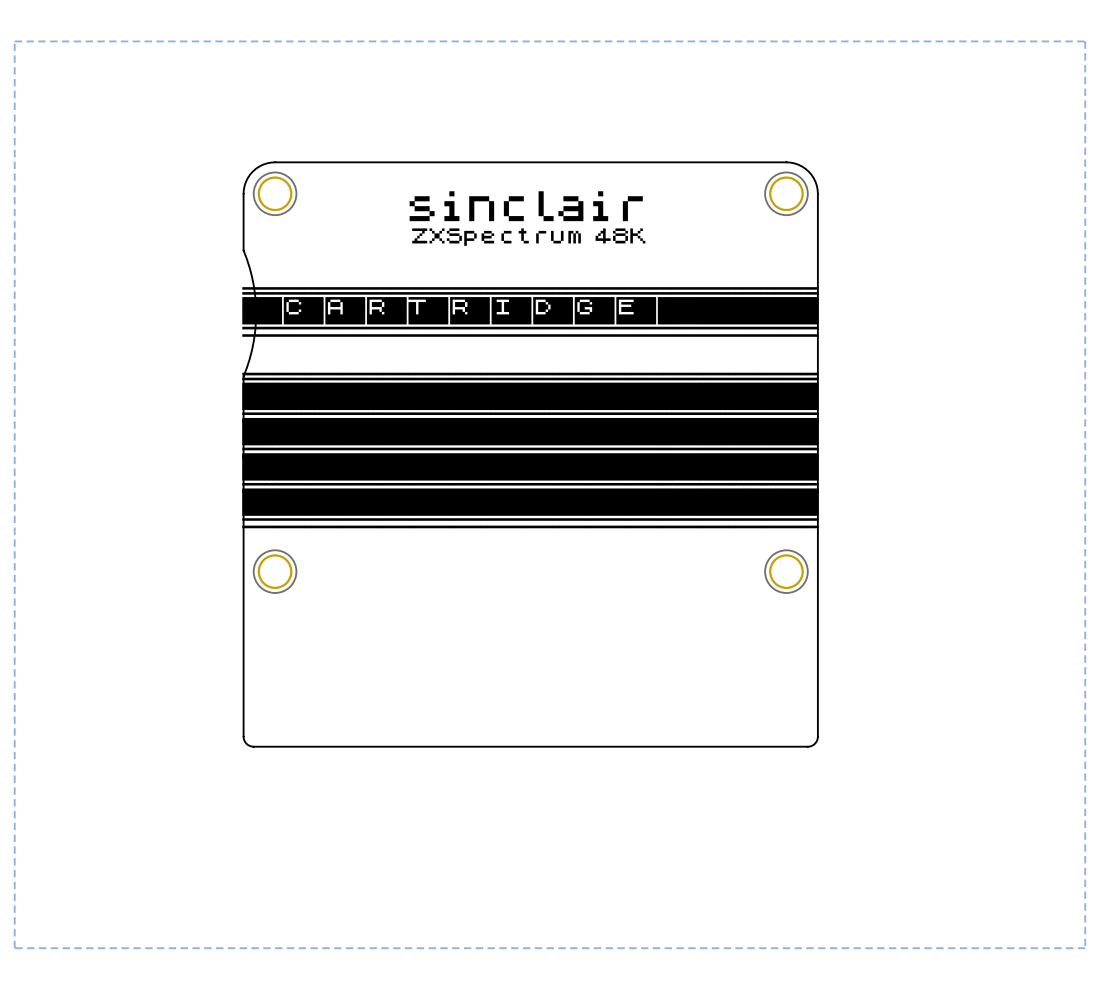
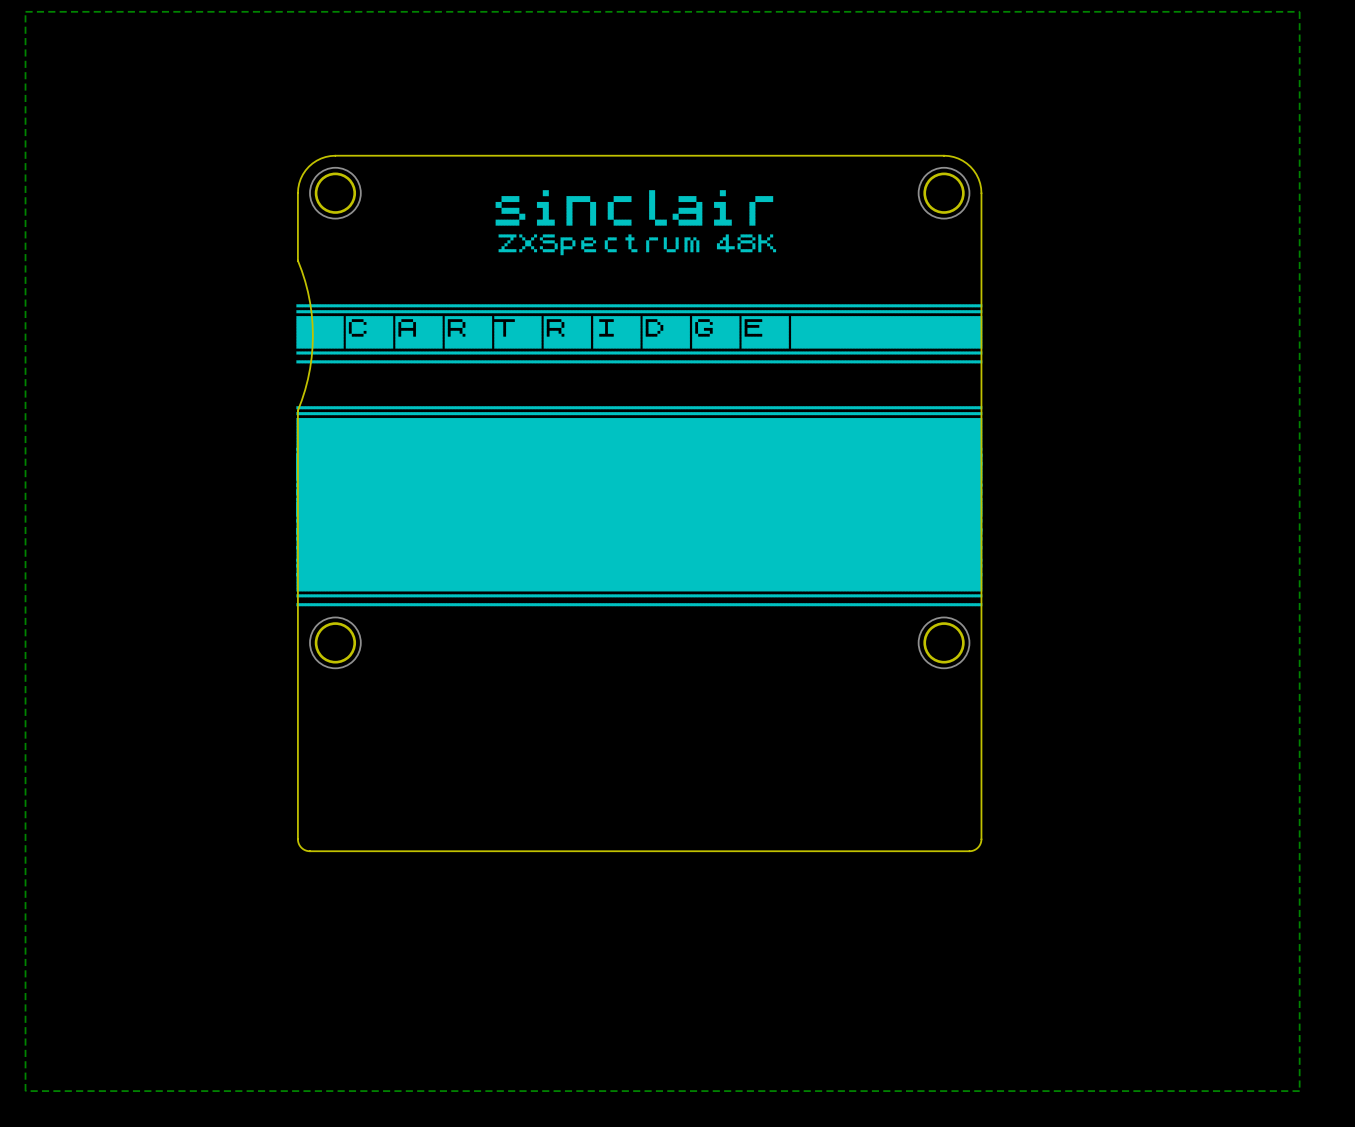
drawing: none -> [296, 447, 983, 607]
drawing: [242, 417, 819, 458] -> none
drawing: [242, 488, 819, 529] -> none

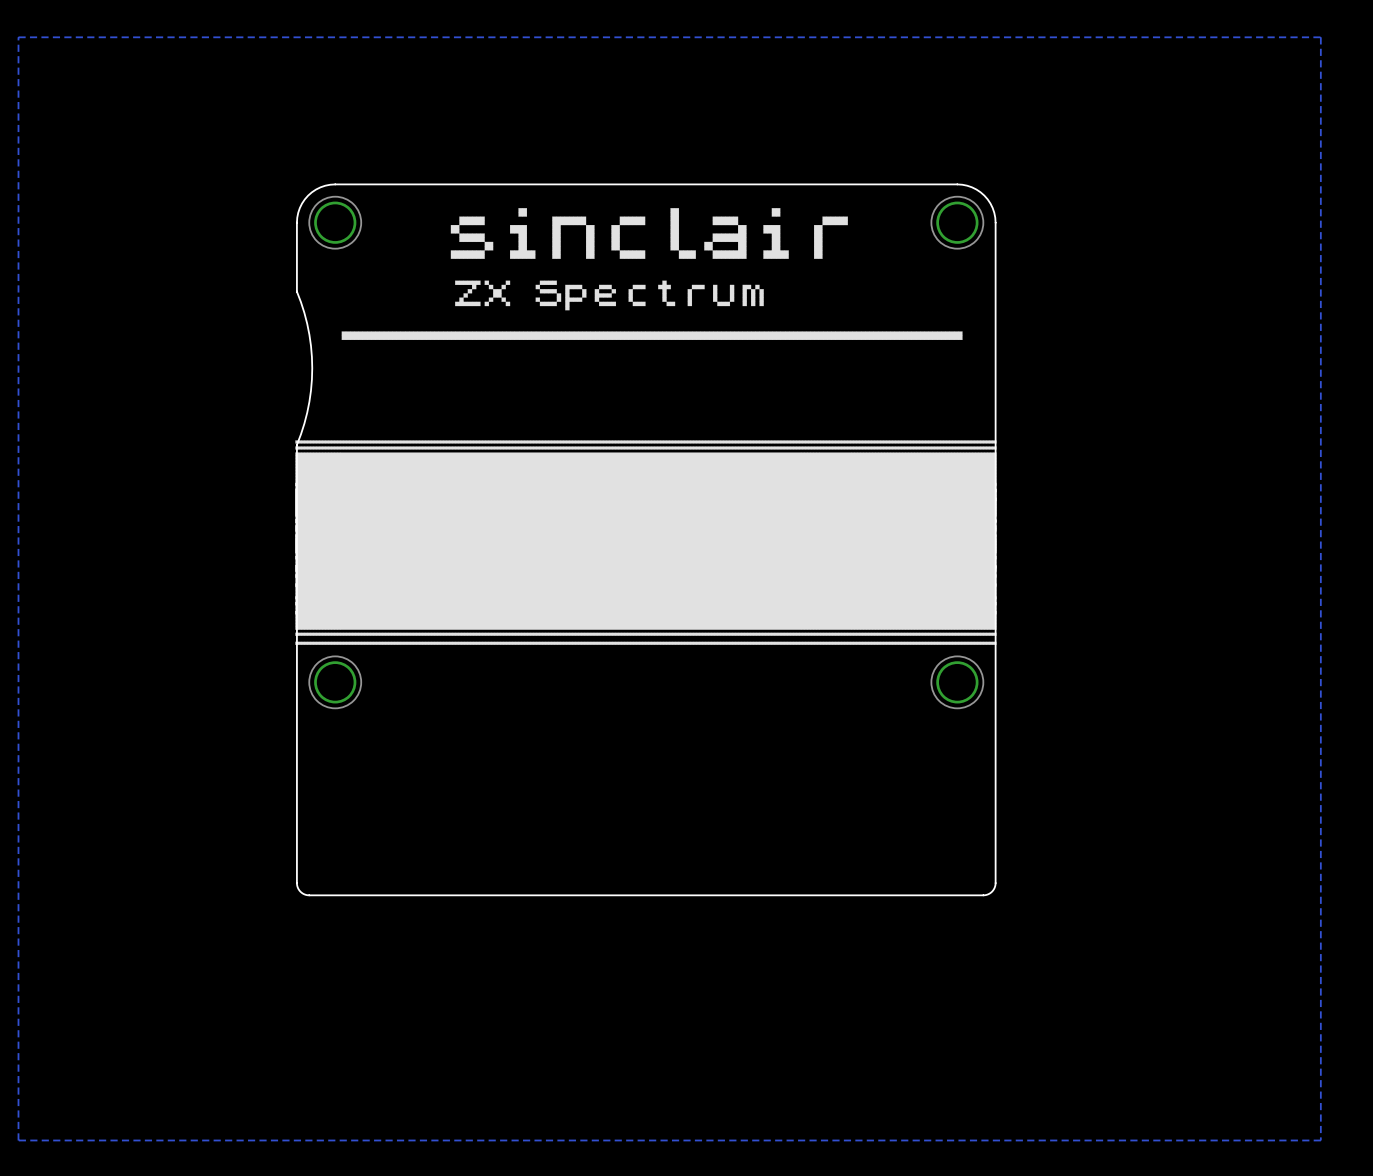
drawing: none -> [341, 208, 963, 340]
drawing: [495, 190, 777, 256] -> none
drawing: [296, 304, 983, 364] -> none

